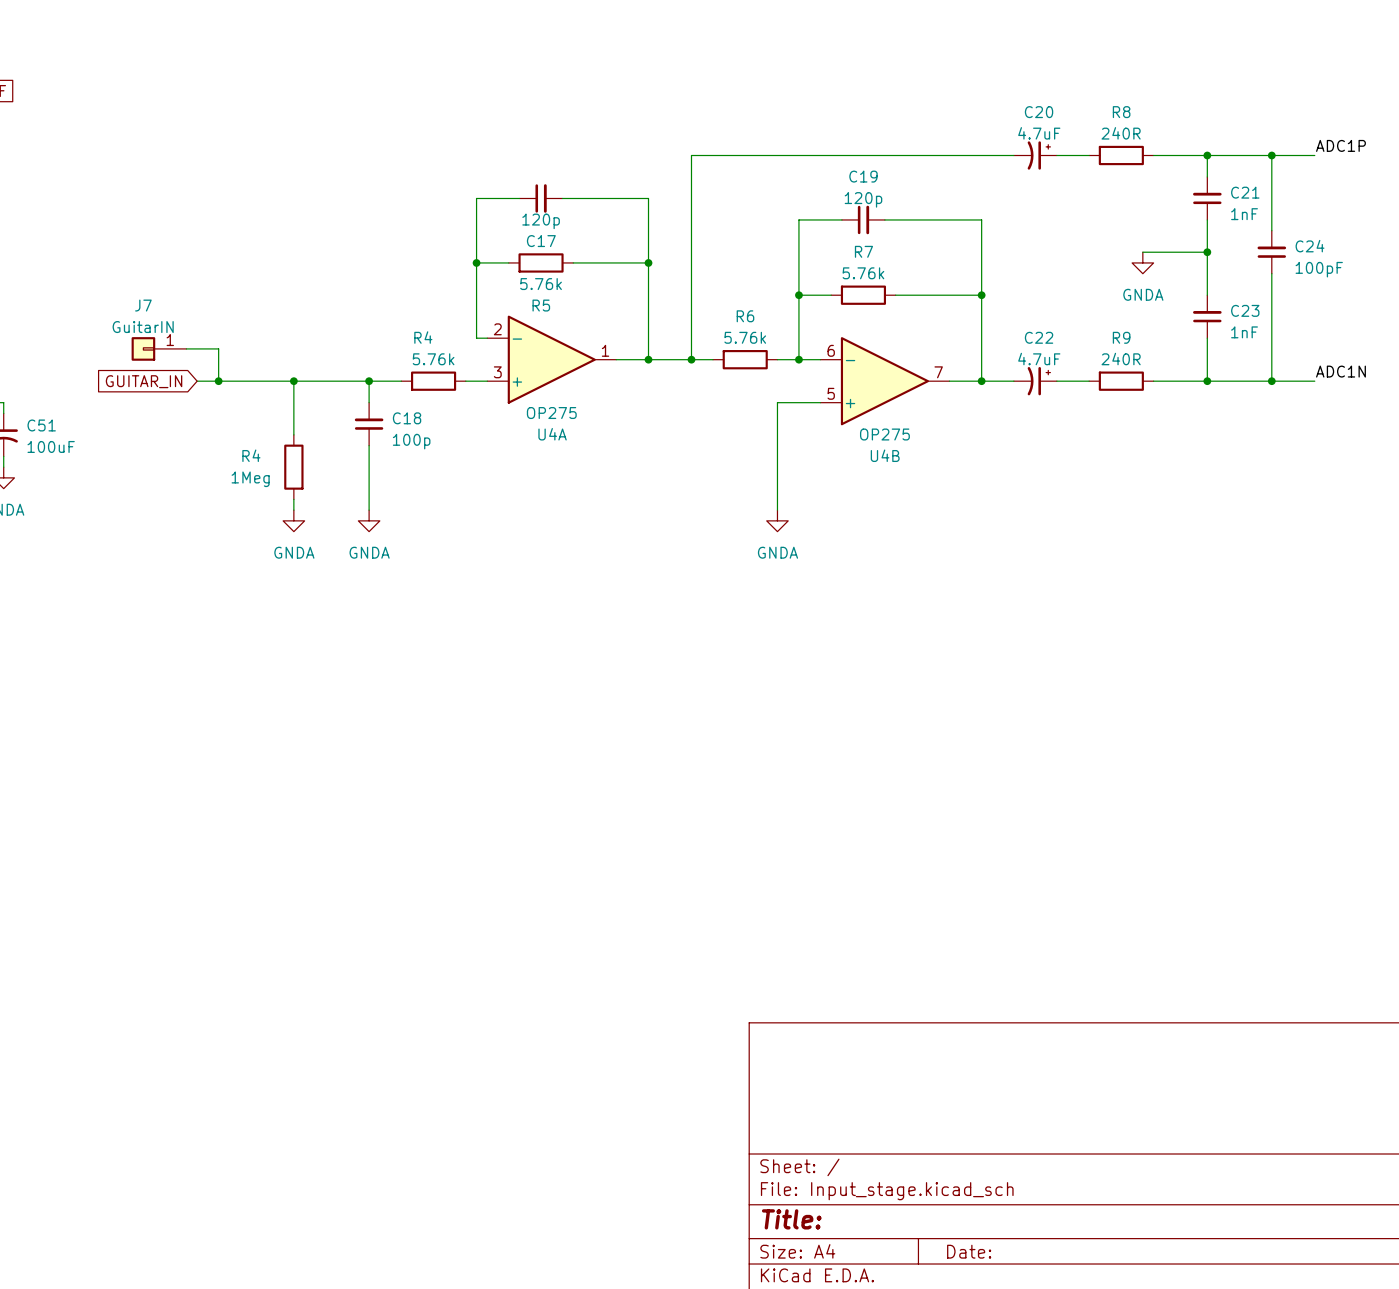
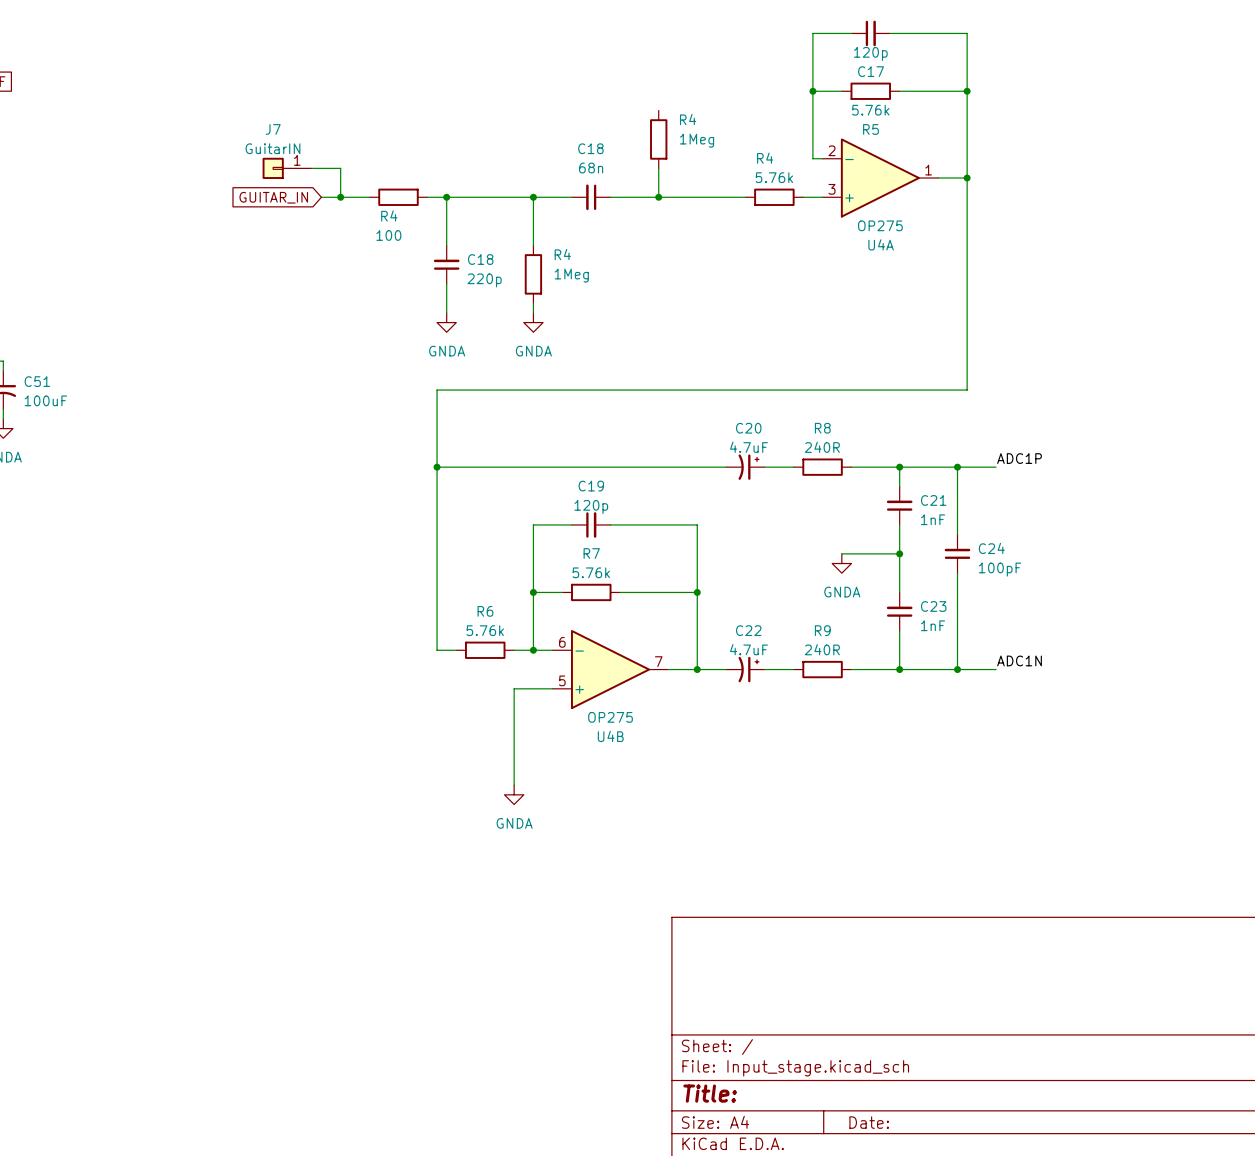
wire: none -> (851, 33) (812, 33) (812, 158) (822, 158)
wire: none -> (890, 33) (967, 33) (967, 390) (437, 390) (437, 650) (456, 650)
wire: none -> (812, 91) (841, 91)
junction: none -> (812, 91)
wire: none -> (899, 91) (967, 91)
junction: none -> (967, 91)
label: ADC1P (1340, 145) -> none
R4: none -> 1Meg (658, 139)
wire: (1013, 155) (691, 155) (691, 359) -> none
C20 position: (1035, 155) -> (745, 467)
wire: (1056, 155) (1089, 155) -> (938, 178) (967, 178)
R8 position: (1121, 155) -> (822, 467)
wire: (1153, 155) (1314, 155) -> none
wire: (1207, 155) (1207, 176) -> none
junction: (1207, 155) -> none
wire: (1271, 155) (1271, 230) -> none
junction: (1271, 155) -> none
wire: none -> (311, 168) (340, 168) (340, 197)
wire: none -> (658, 168) (658, 197)
wire: (519, 198) (476, 198) (476, 338) (487, 338) -> none
C17 position: (541, 198) -> (870, 33)
wire: (562, 198) (648, 198) (648, 359) -> none
junction: none -> (967, 178)
C21 position: (1207, 198) -> (899, 505)
wire: none -> (321, 197) (369, 197)
junction: none -> (340, 197)
R4: none -> 100 (398, 197)
wire: none -> (427, 197) (571, 197)
wire: none -> (446, 197) (446, 245)
wire: none -> (533, 197) (533, 245)
junction: none -> (533, 197)
C18: none -> 68n (591, 197)
junction: none -> (658, 197)
wire: (798, 219) (798, 359) -> (716, 197) (610, 197)
C19 position: (863, 219) -> (591, 524)
R4: none -> 5.76k (774, 197)
wire: (917, 219) (981, 219) (981, 381) -> none
wire: (1207, 219) (1207, 295) -> none
global label: none -> GUITAR_IN (273, 197)
wire: (1142, 252) (1207, 252) -> none
junction: (1207, 252) -> none
C24 position: (1271, 252) -> (957, 553)
wire: (476, 262) (508, 262) -> none
junction position: (476, 262) -> (446, 197)
R5 position: (541, 262) -> (870, 91)
wire: (573, 262) (648, 262) -> none
junction: (648, 262) -> none
power symbol: GNDA (1142, 262) -> none
wire: (1271, 273) (1271, 381) -> none
C18: none -> 220p (446, 264)
wire: (798, 295) (831, 295) -> none
junction: (798, 295) -> none
R7 position: (863, 295) -> (591, 592)
wire: (895, 295) (981, 295) -> none
junction: (981, 295) -> none
R4: none -> 1Meg (533, 274)
wire: none -> (446, 284) (446, 312)
C23 position: (1207, 316) -> (899, 611)
wire: none -> (533, 303) (533, 312)
wire: (1207, 338) (1207, 381) -> none
J7 position: (159, 348) -> (287, 168)
wire: (186, 348) (218, 348) (218, 381) -> none
power symbol: none -> GNDA (446, 322)
U4A position: (551, 359) -> (880, 178)
power symbol: none -> GNDA (533, 322)
wire: (616, 359) (712, 359) -> none
junction: (648, 359) -> none
junction: (691, 359) -> none
R6 position: (745, 359) -> (485, 650)
wire: (777, 359) (820, 359) -> none
junction: (798, 359) -> none
label: ADC1N (1340, 371) -> none
global label: GUITAR_IN (144, 381) -> none
wire: (197, 381) (401, 381) -> none
junction: (218, 381) -> none
wire: (293, 381) (293, 434) -> none
junction: (293, 381) -> none
wire: (369, 381) (369, 402) -> none
junction: (369, 381) -> none
R4: 5.76k (433, 381) -> none
wire: (465, 381) (487, 381) -> none
U4B position: (884, 381) -> (610, 669)
wire: (949, 381) (1013, 381) -> none
junction: (981, 381) -> none
C22 position: (1035, 381) -> (745, 669)
wire: (1056, 381) (1089, 381) -> none
R9 position: (1121, 381) -> (822, 669)
wire: (1153, 381) (1314, 381) -> none
junction: (1207, 381) -> none
junction: (1271, 381) -> none
wire: (820, 402) (777, 402) (777, 510) -> none
C18: 100p (369, 424) -> none
wire: (369, 445) (369, 510) -> none
R4: 1Meg (293, 467) -> none
wire: (293, 499) (293, 510) -> none
label: none -> ADC1P (1019, 458)
power symbol: GNDA (293, 520) -> none
power symbol: GNDA (369, 520) -> none
wire: none -> (437, 467) (726, 467)
junction: none -> (437, 467)
power symbol: GNDA (777, 520) -> none
wire: none -> (764, 467) (793, 467)
wire: none -> (851, 467) (996, 467)
wire: none -> (899, 467) (899, 486)
junction: none -> (899, 467)
wire: none -> (957, 467) (957, 534)
junction: none -> (957, 467)
wire: none -> (571, 524) (533, 524) (533, 650)
wire: none -> (610, 524) (697, 524) (697, 669)
wire: none -> (899, 524) (899, 592)
wire: none -> (841, 553) (899, 553)
junction: none -> (899, 553)
power symbol: none -> GNDA (841, 563)
wire: none -> (957, 573) (957, 669)
wire: none -> (533, 592) (562, 592)
junction: none -> (533, 592)
wire: none -> (620, 592) (697, 592)
junction: none -> (697, 592)
wire: none -> (899, 631) (899, 669)
wire: none -> (514, 650) (552, 650)
junction: none -> (533, 650)
label: none -> ADC1N (1019, 660)
wire: none -> (668, 669) (726, 669)
junction: none -> (697, 669)
wire: none -> (764, 669) (793, 669)
wire: none -> (851, 669) (996, 669)
junction: none -> (899, 669)
junction: none -> (957, 669)
wire: none -> (552, 688) (514, 688) (514, 785)
power symbol: none -> GNDA (514, 794)

